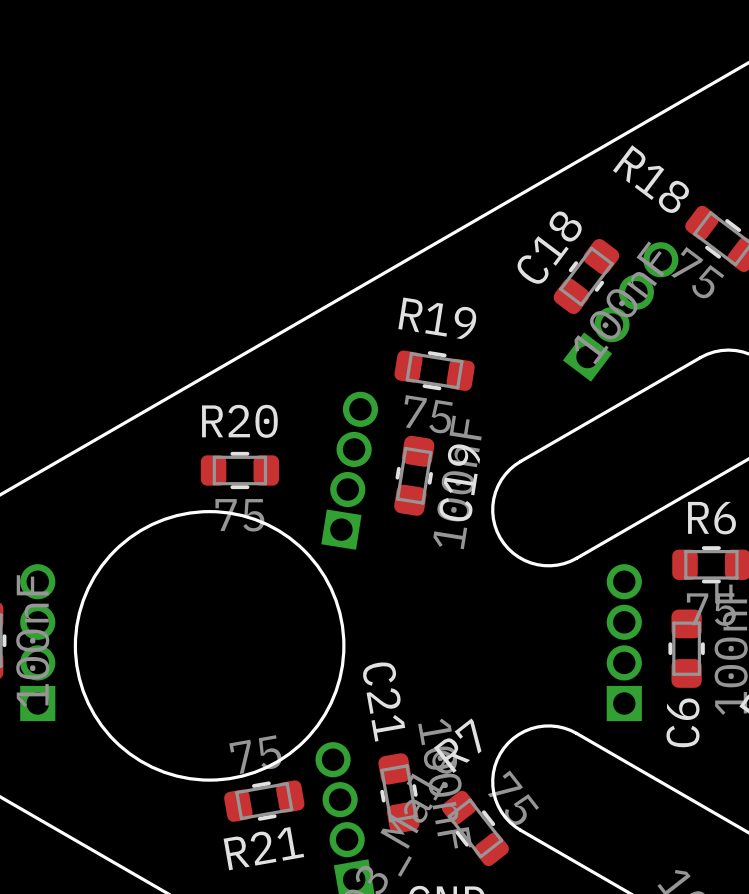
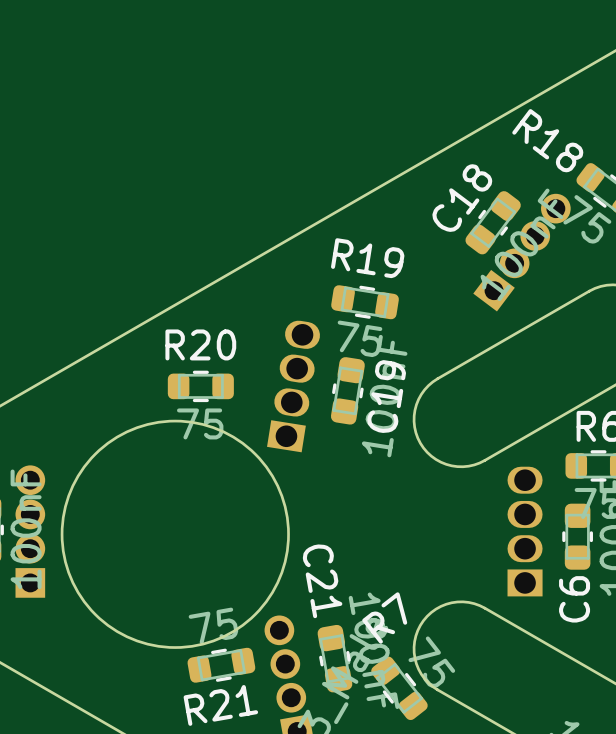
part footprint: [321, 391, 379, 550] -> [267, 320, 320, 453]
part footprint: [606, 564, 642, 722] -> [507, 466, 543, 597]

